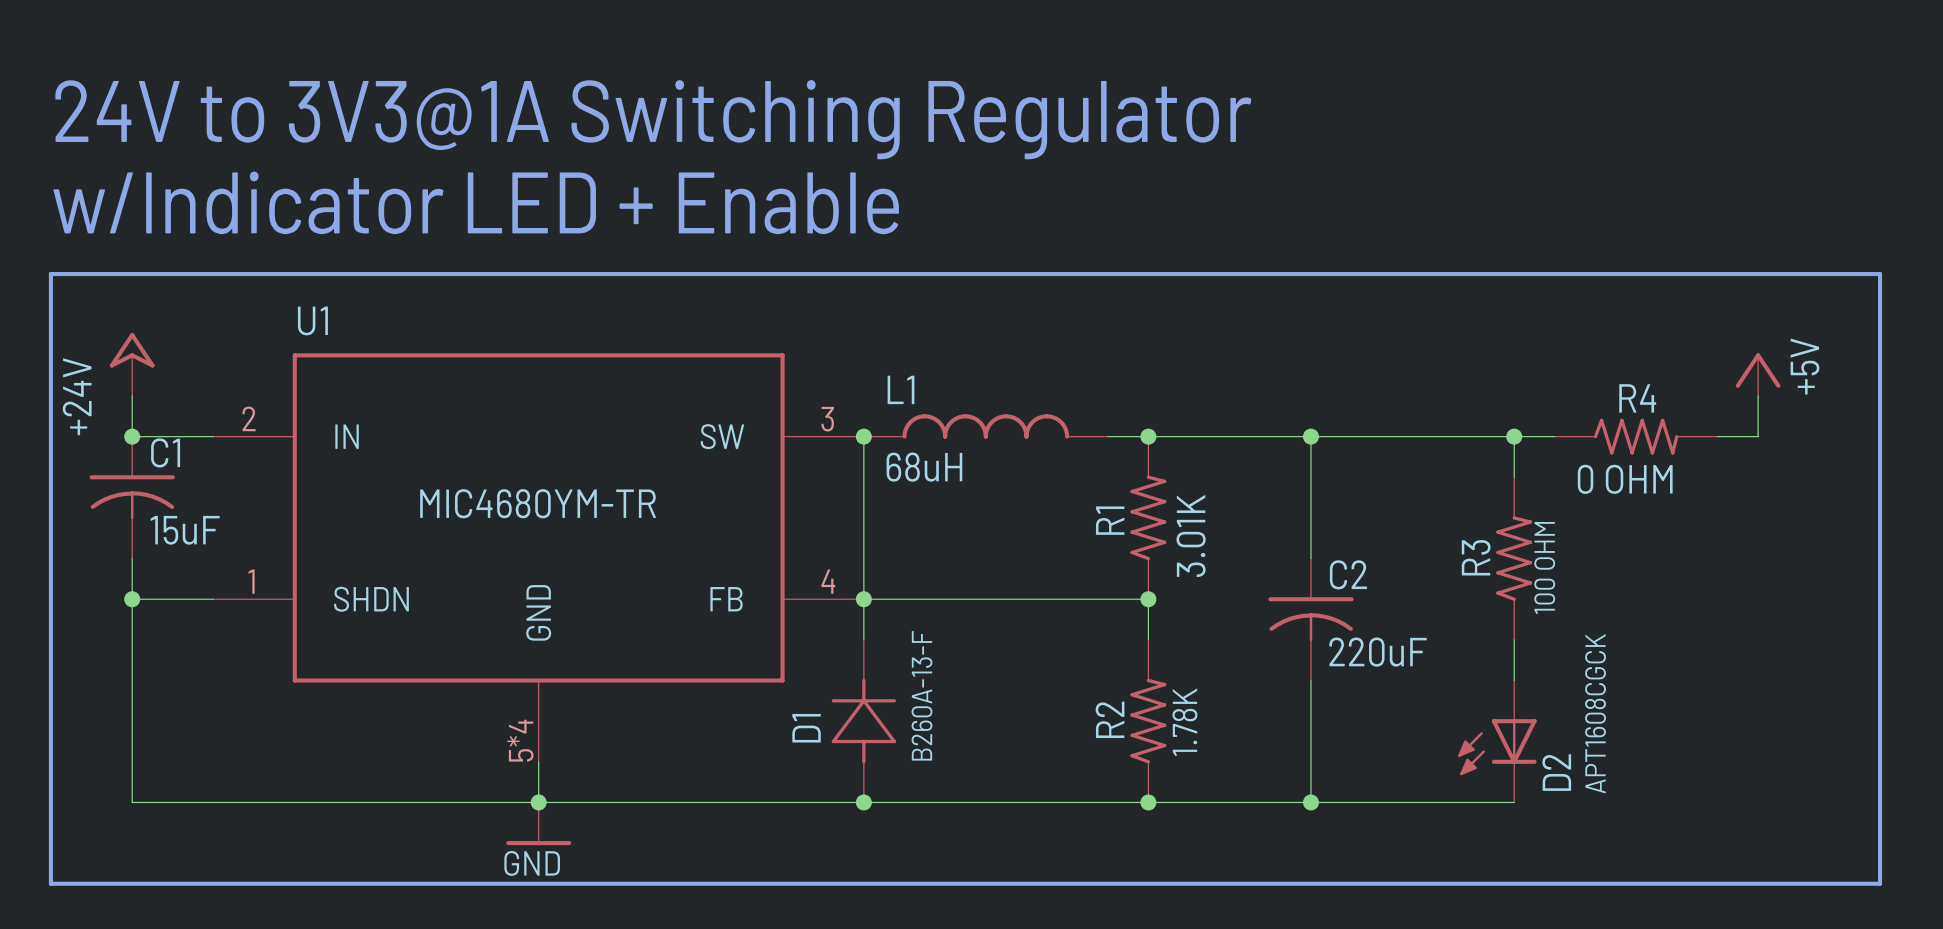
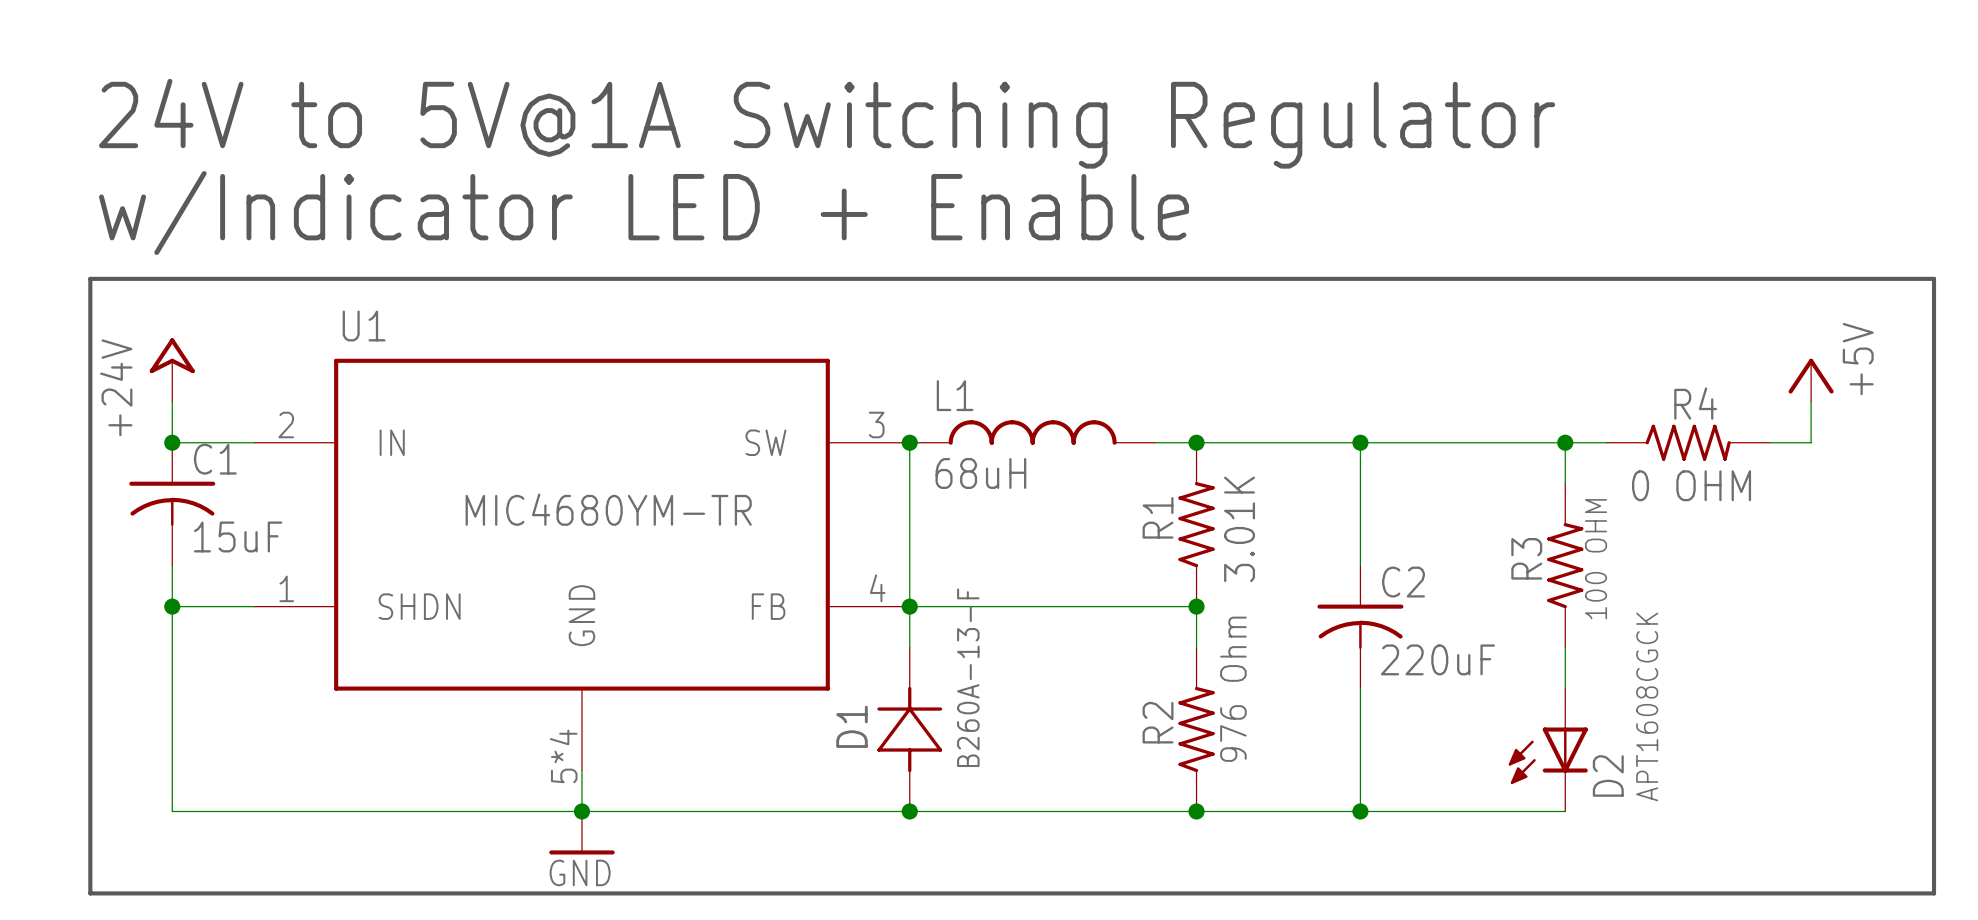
text: 24V to 3V3@1A Switching Regulator (653, 119) -> 24V to 5V@1A Switching Regulator (827, 123)
R2 value: 1.78K (1184, 722) -> 976 Ohm (1233, 689)

